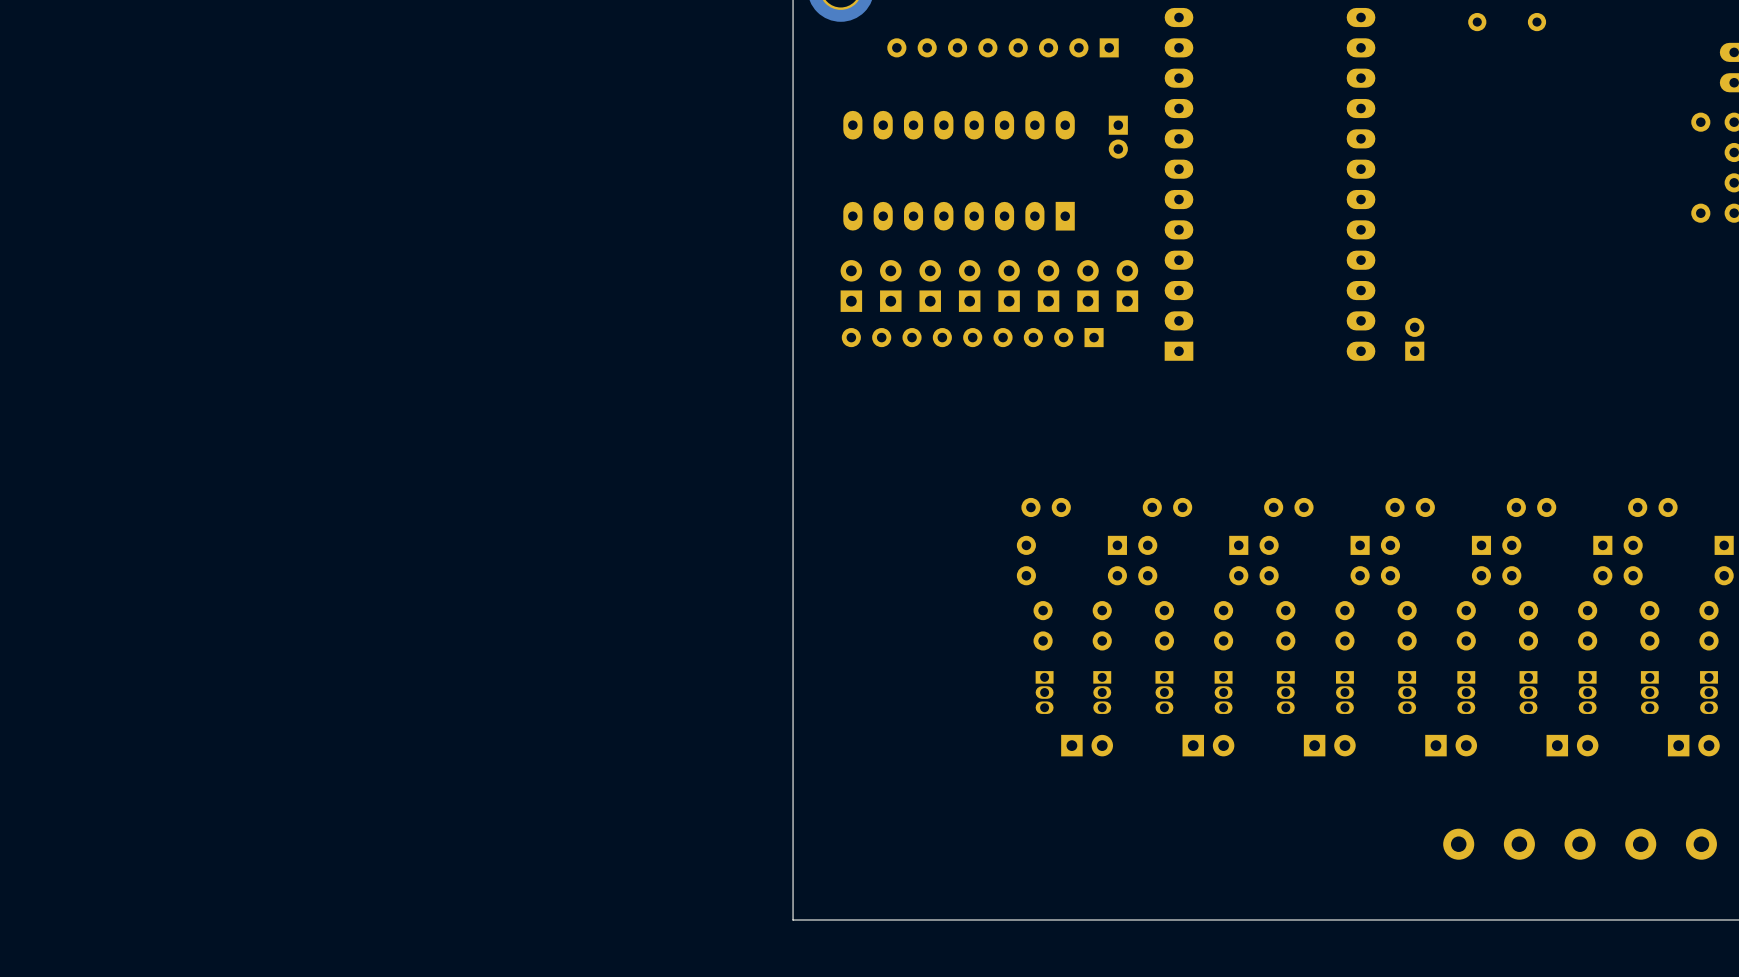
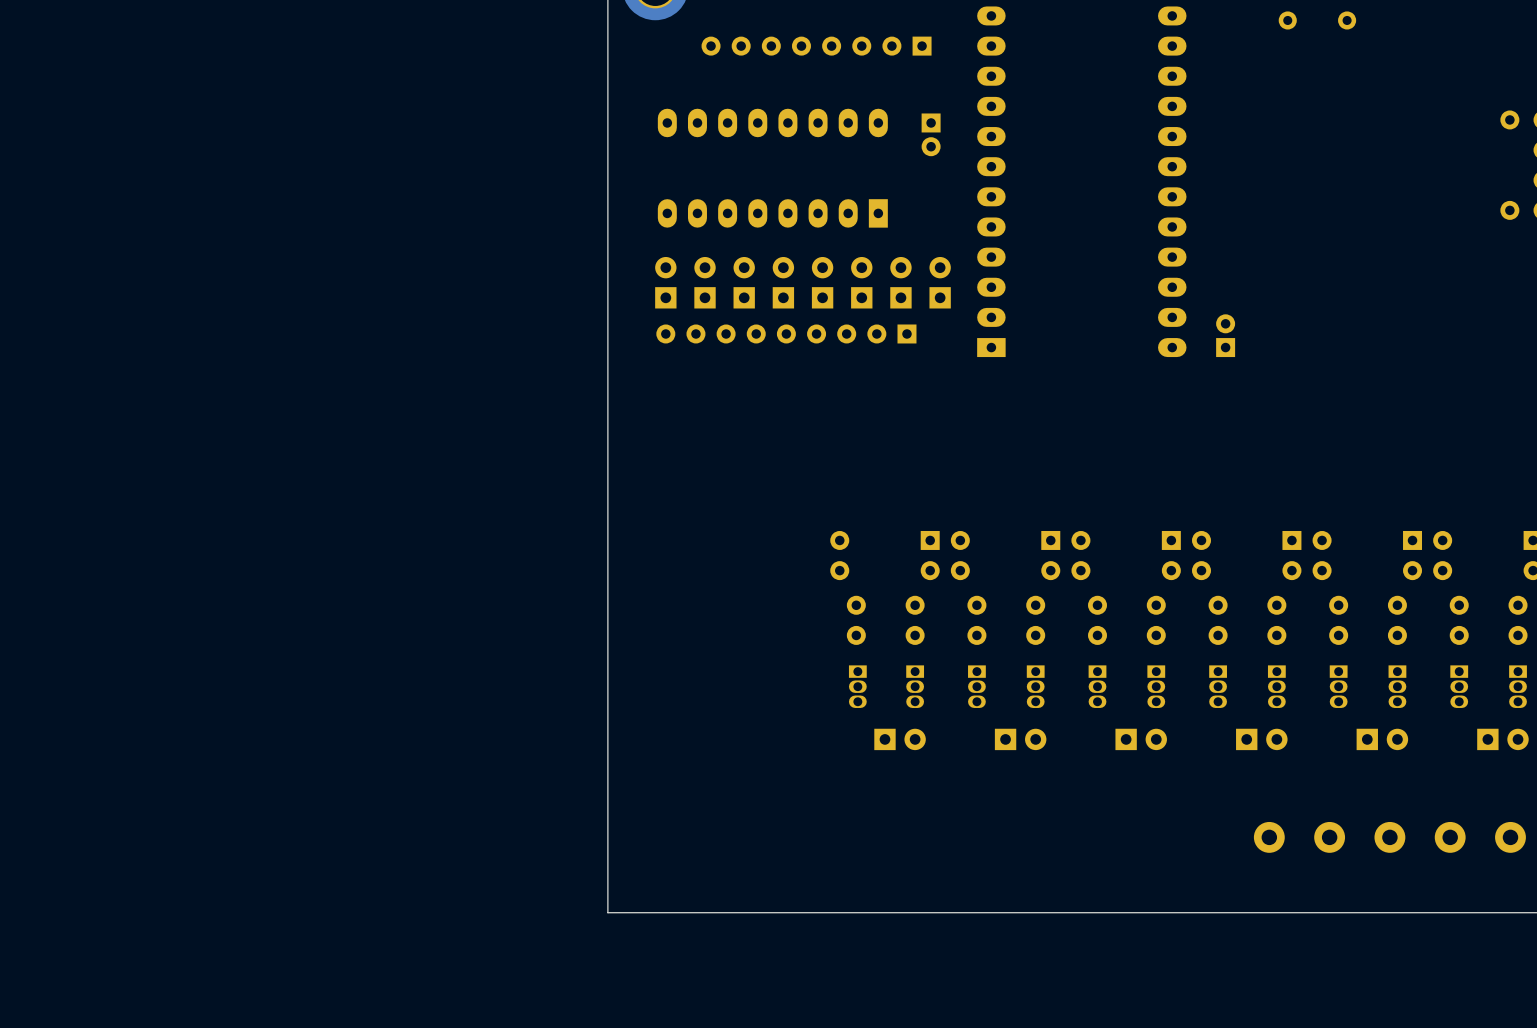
part: (1046, 507) -> none
part: (1167, 507) -> none
part: (1288, 507) -> none
part: (1410, 507) -> none
part: (1531, 507) -> none
part: (1652, 507) -> none

